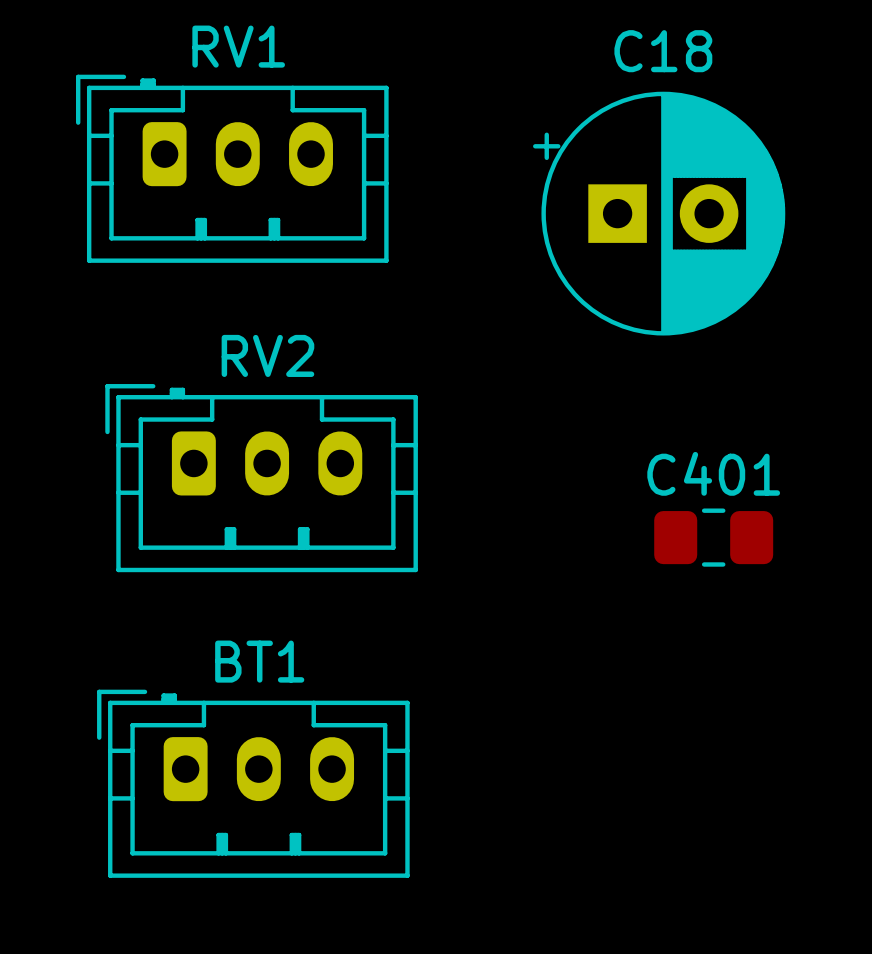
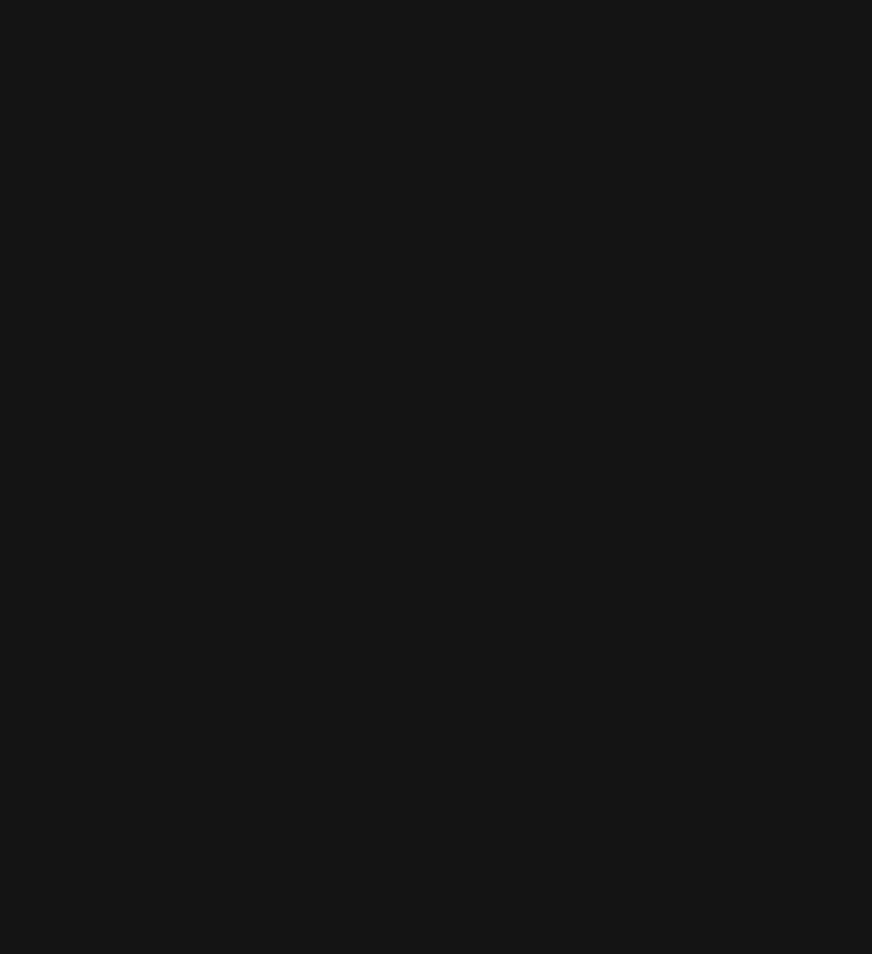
RV1: (232, 168) -> none
C18: (659, 213) -> none
RV2: (261, 478) -> none
C401: (713, 537) -> none
BT1: (253, 783) -> none

